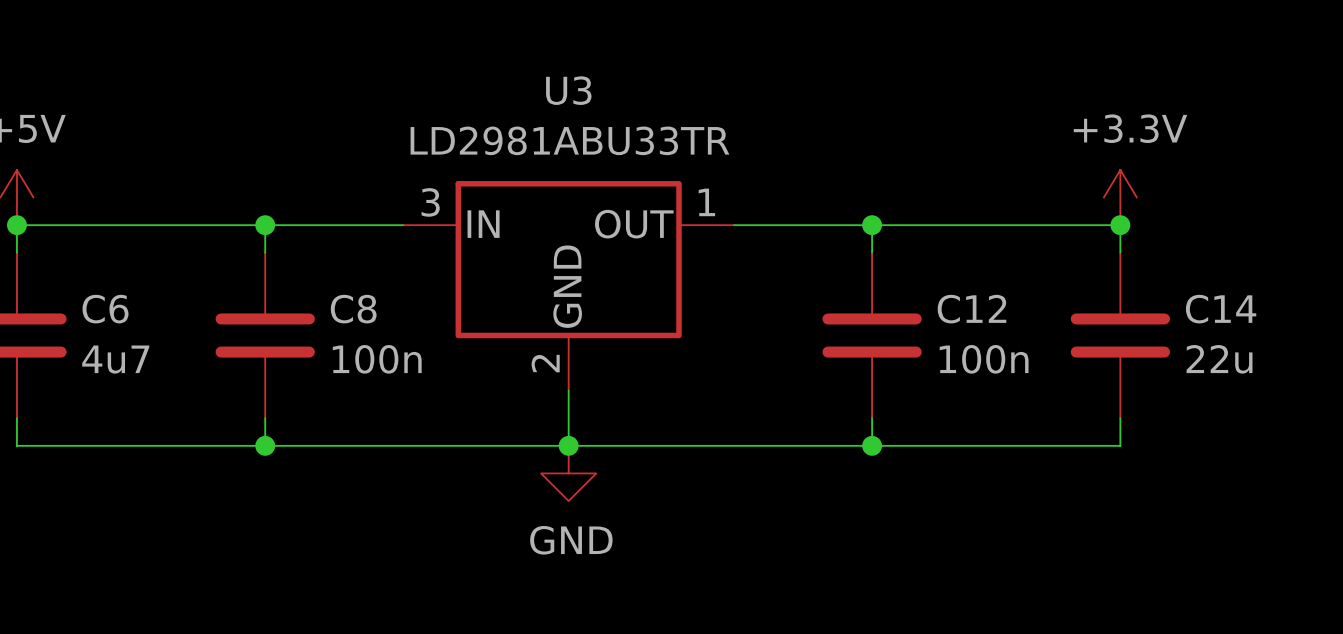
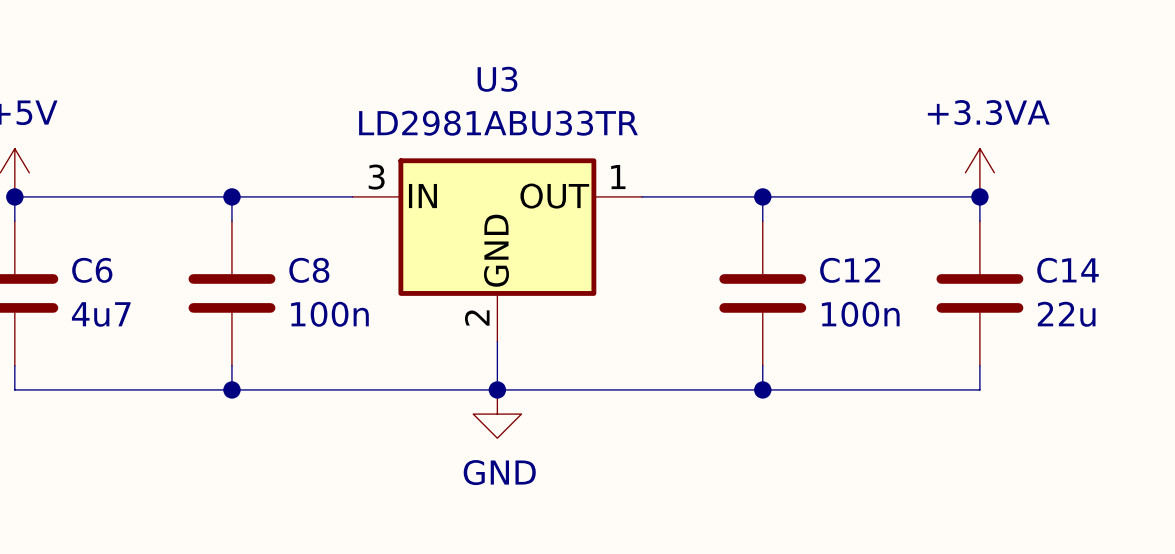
power symbol: +3.3V (1120, 197) -> +3.3VA (979, 172)

